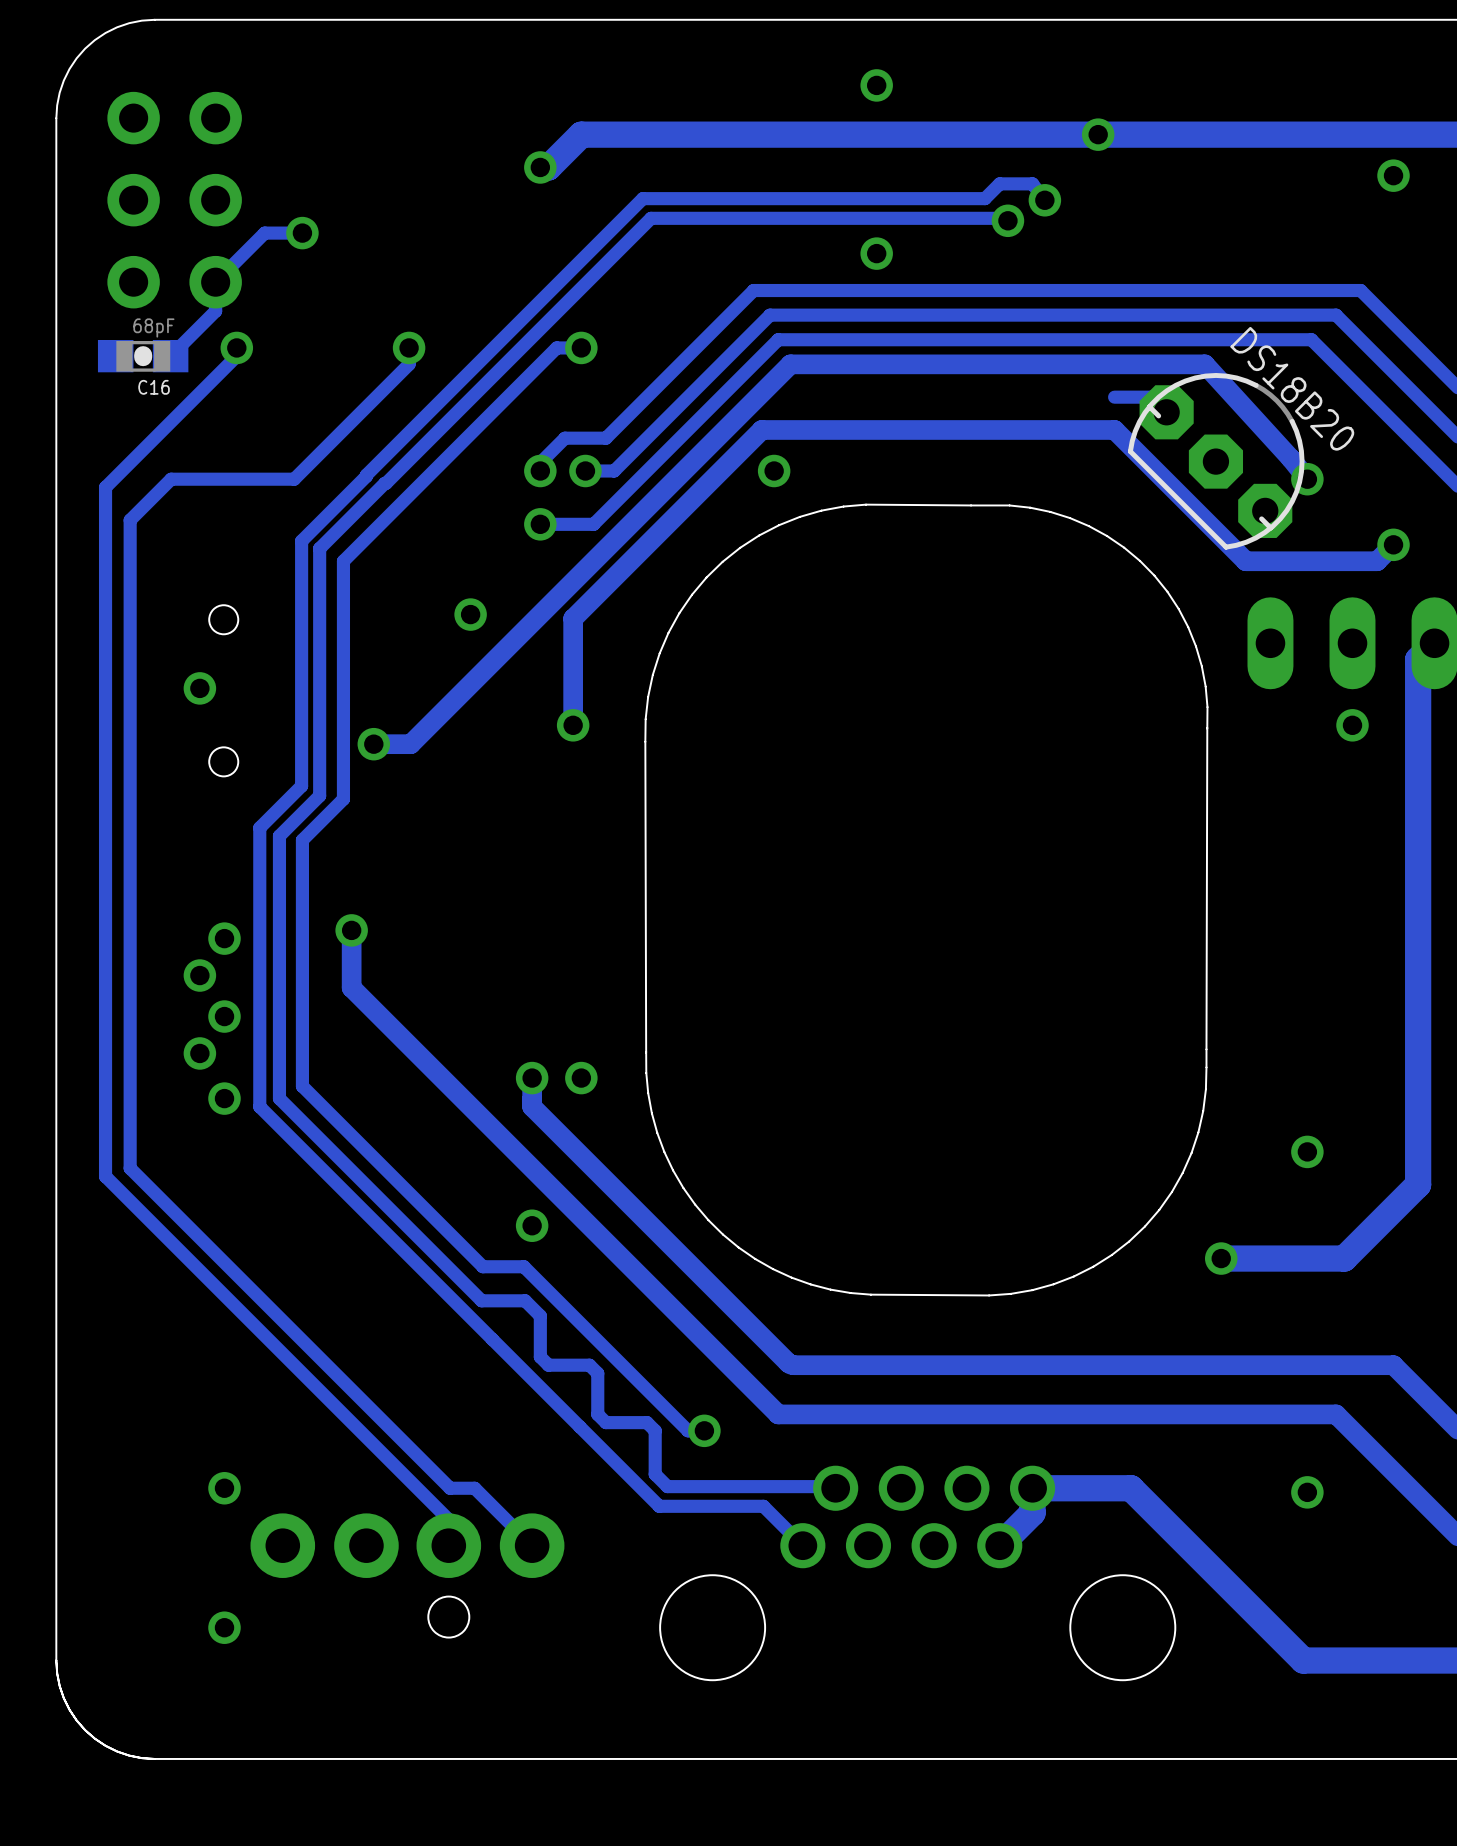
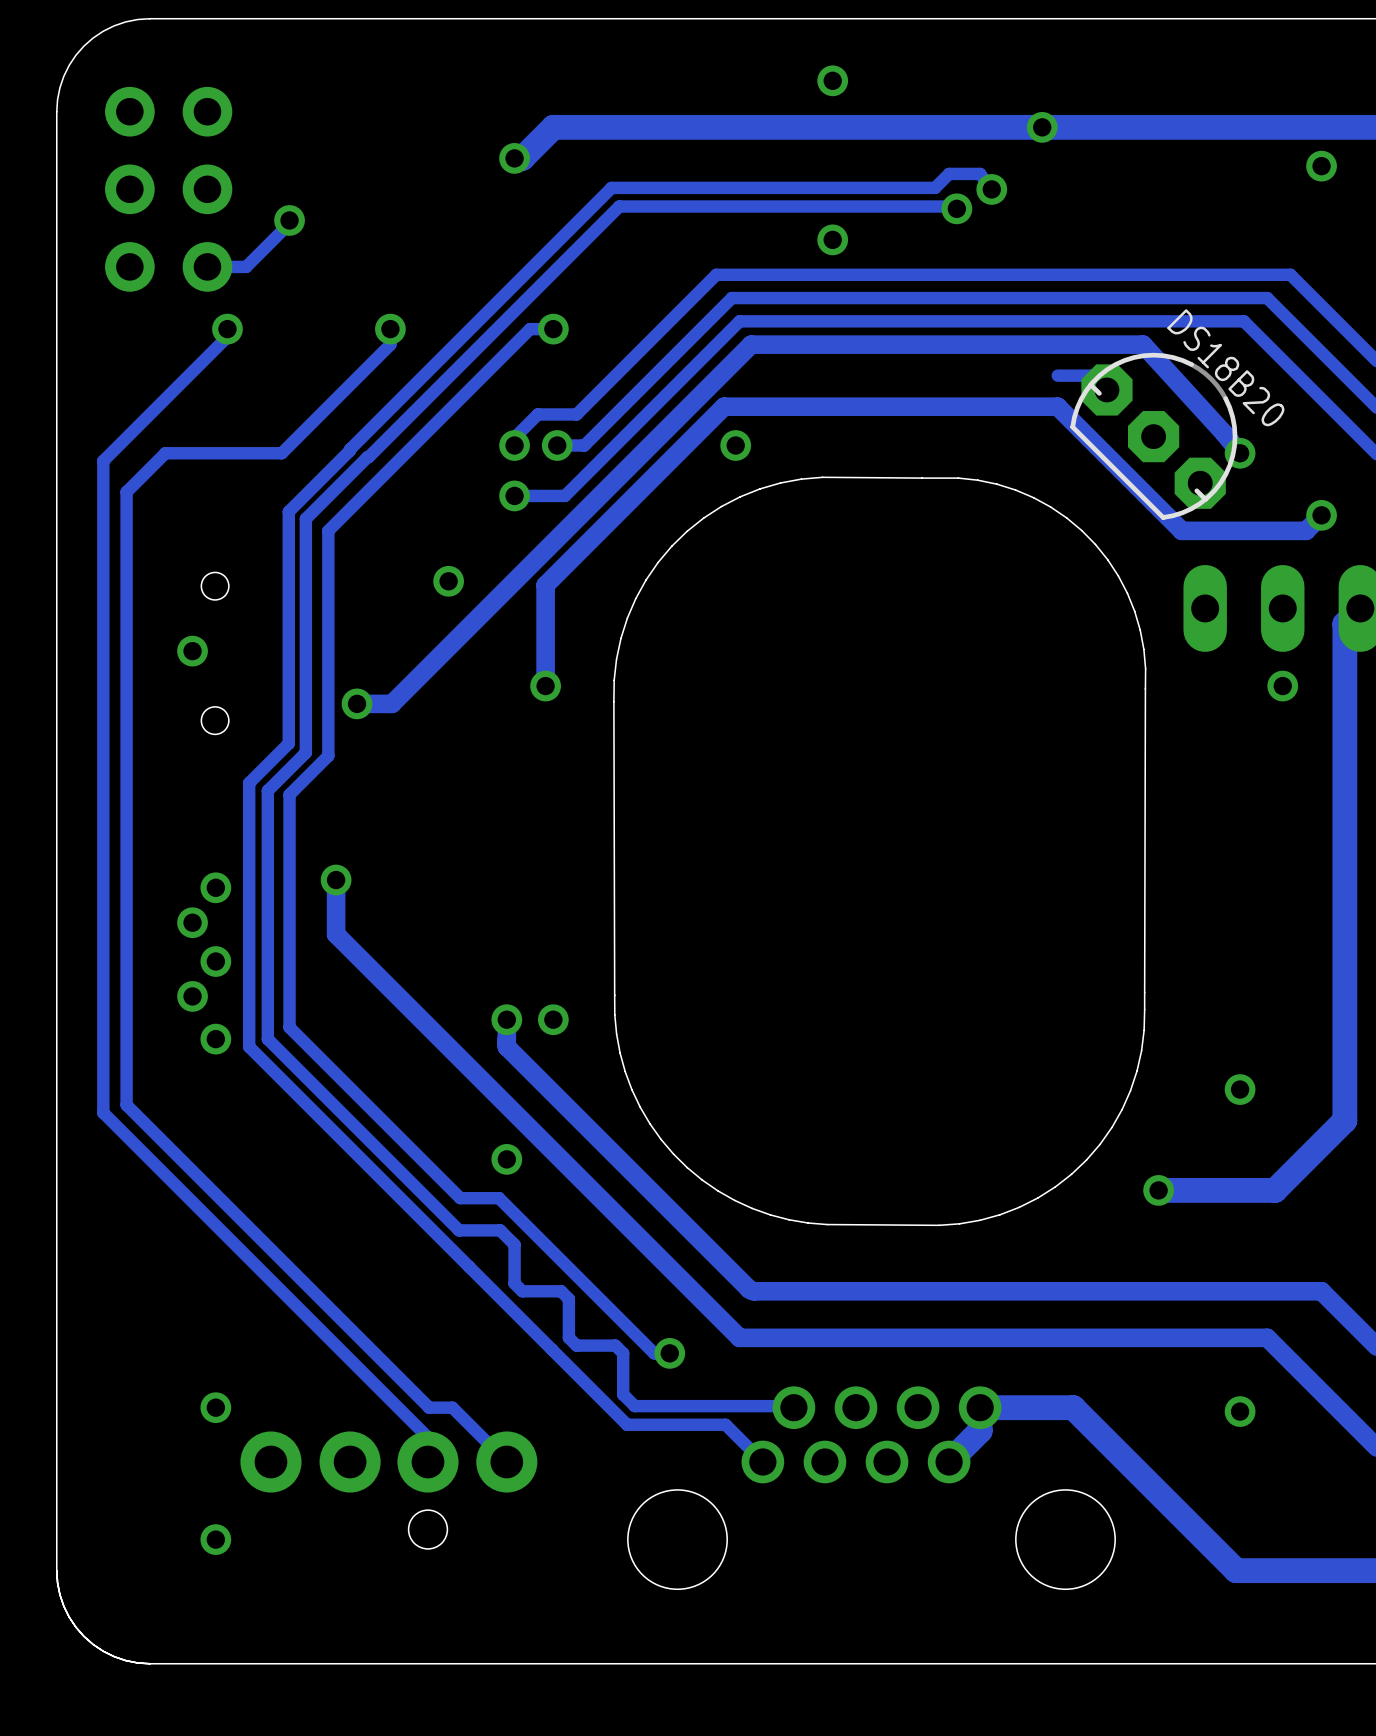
track: (302, 233) (264, 233) (215, 282) (215, 311) (170, 356) -> none
track: none -> (287, 225) (246, 266) (207, 266)
C16: 68pF (143, 356) -> none

